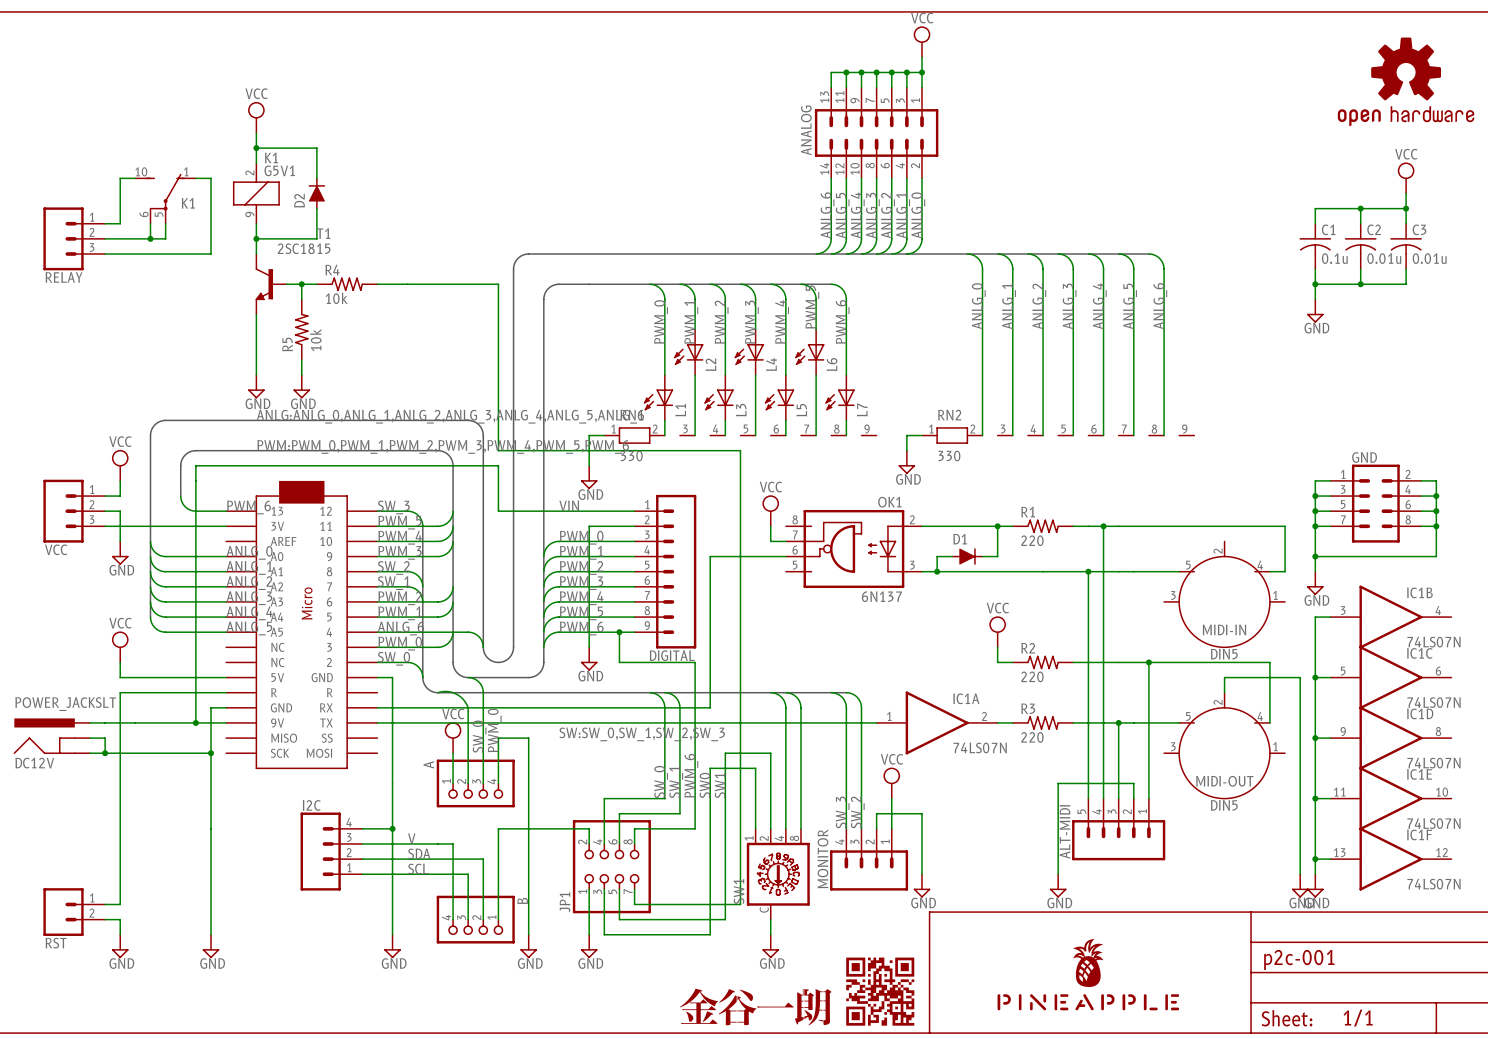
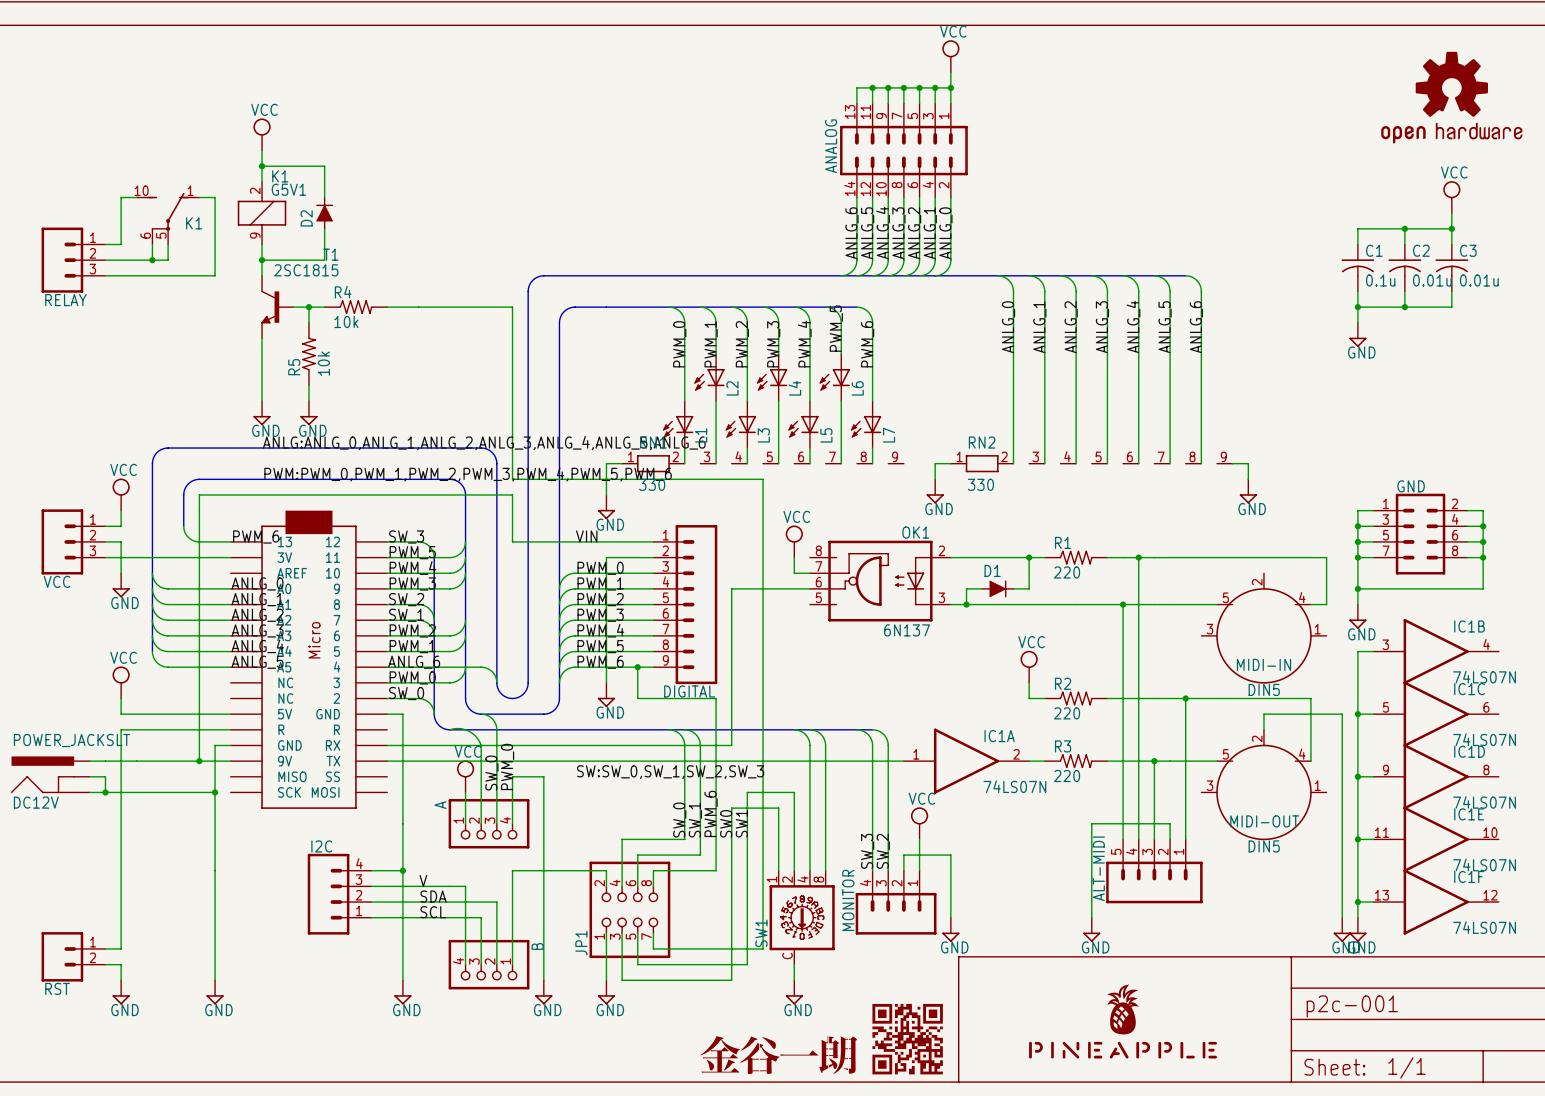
wire: none -> (1232, 463) (1248, 463) (1248, 479)
power symbol: none -> GND (1248, 491)

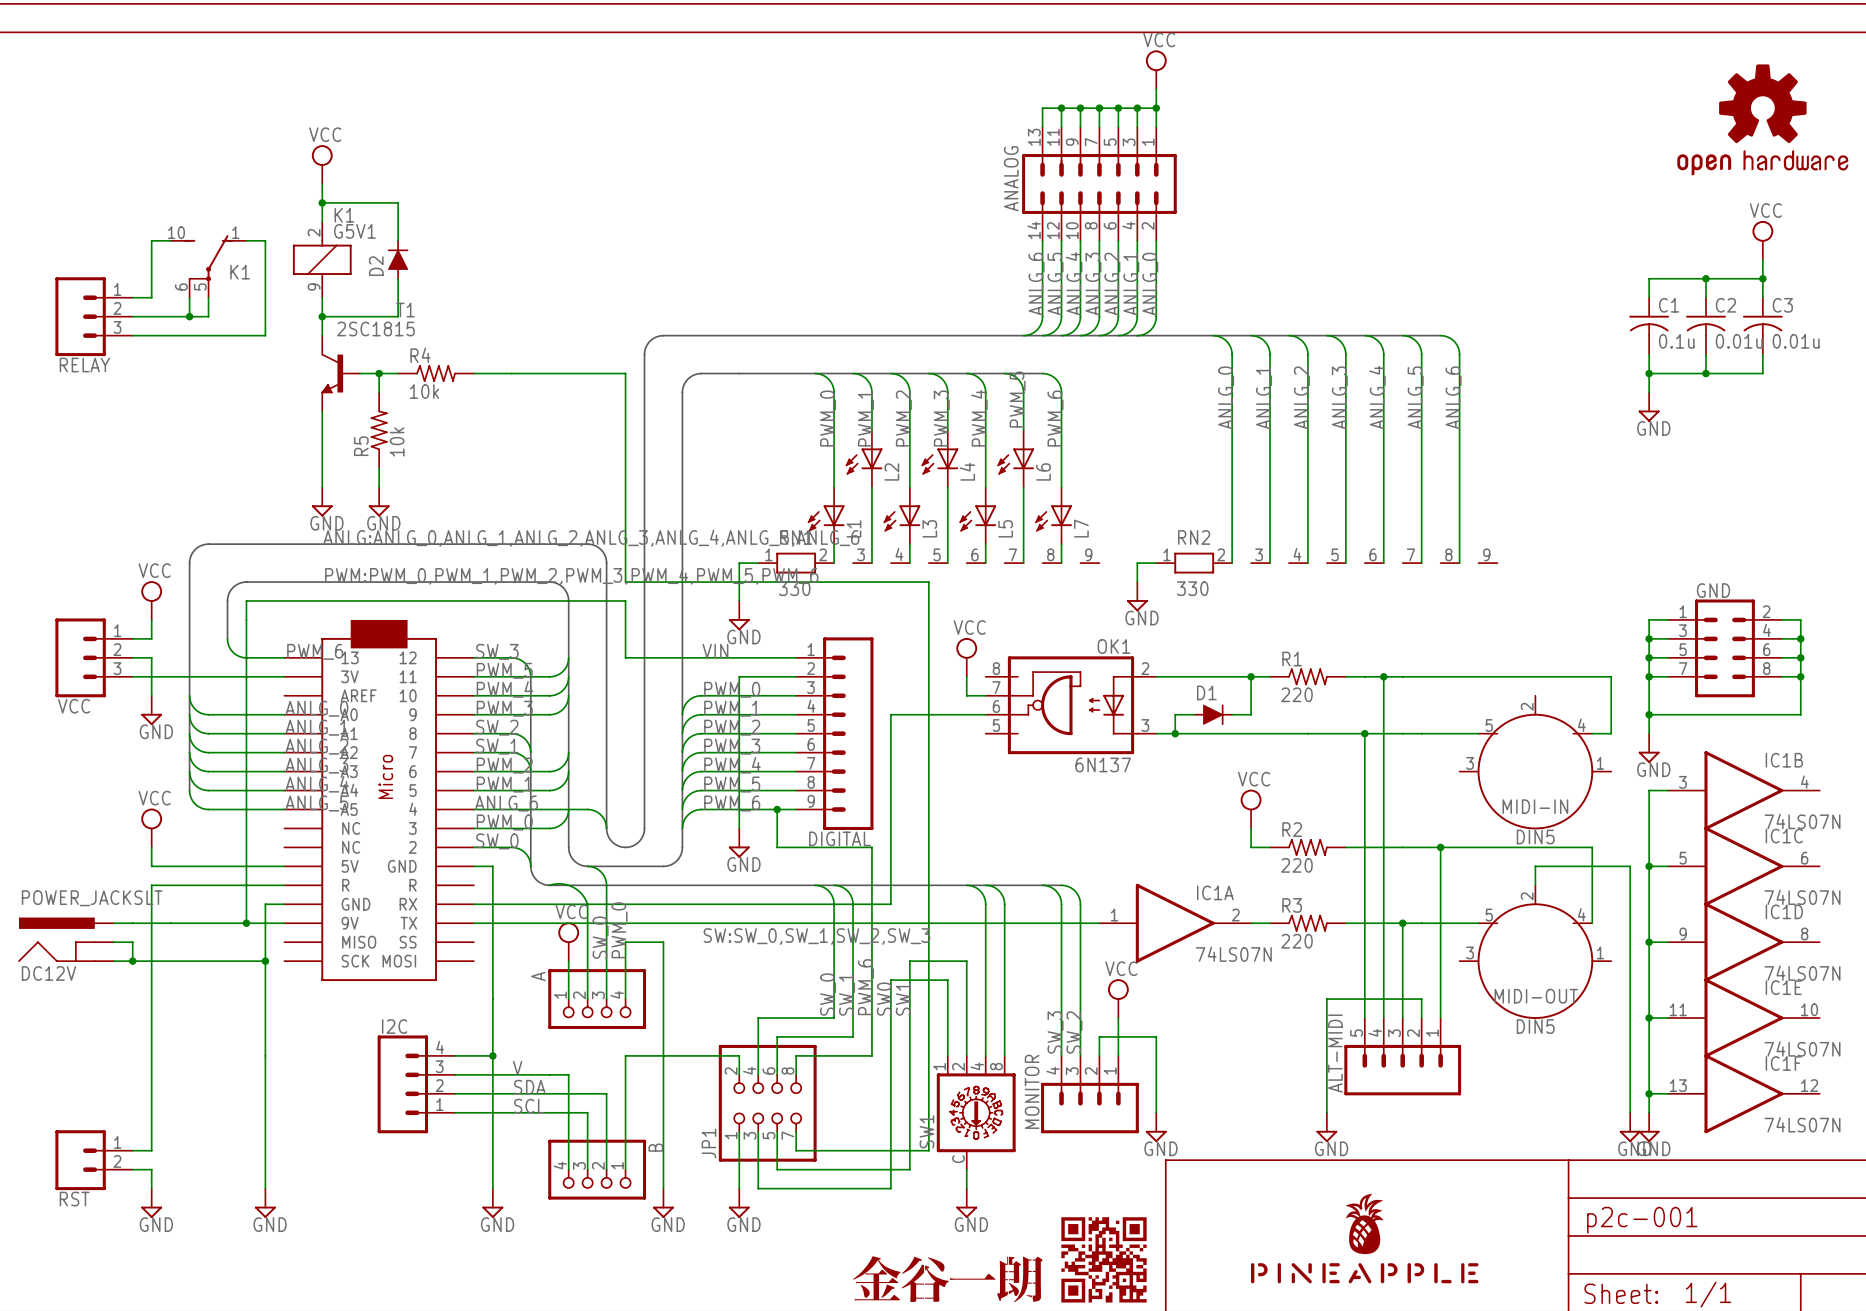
wire: (1232, 463) (1248, 463) (1248, 479) -> none
power symbol: GND (1248, 491) -> none

